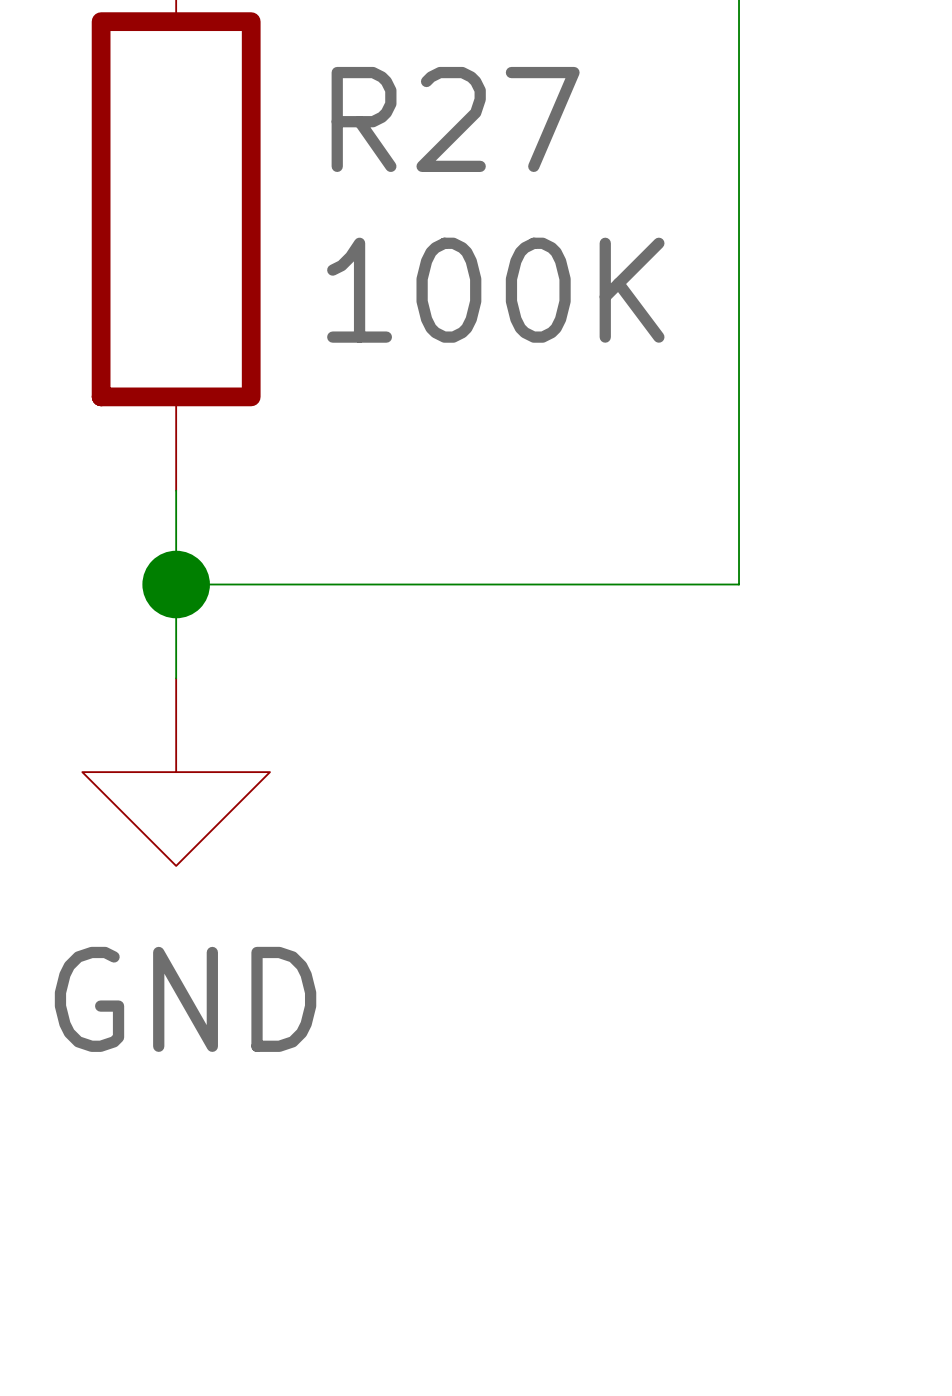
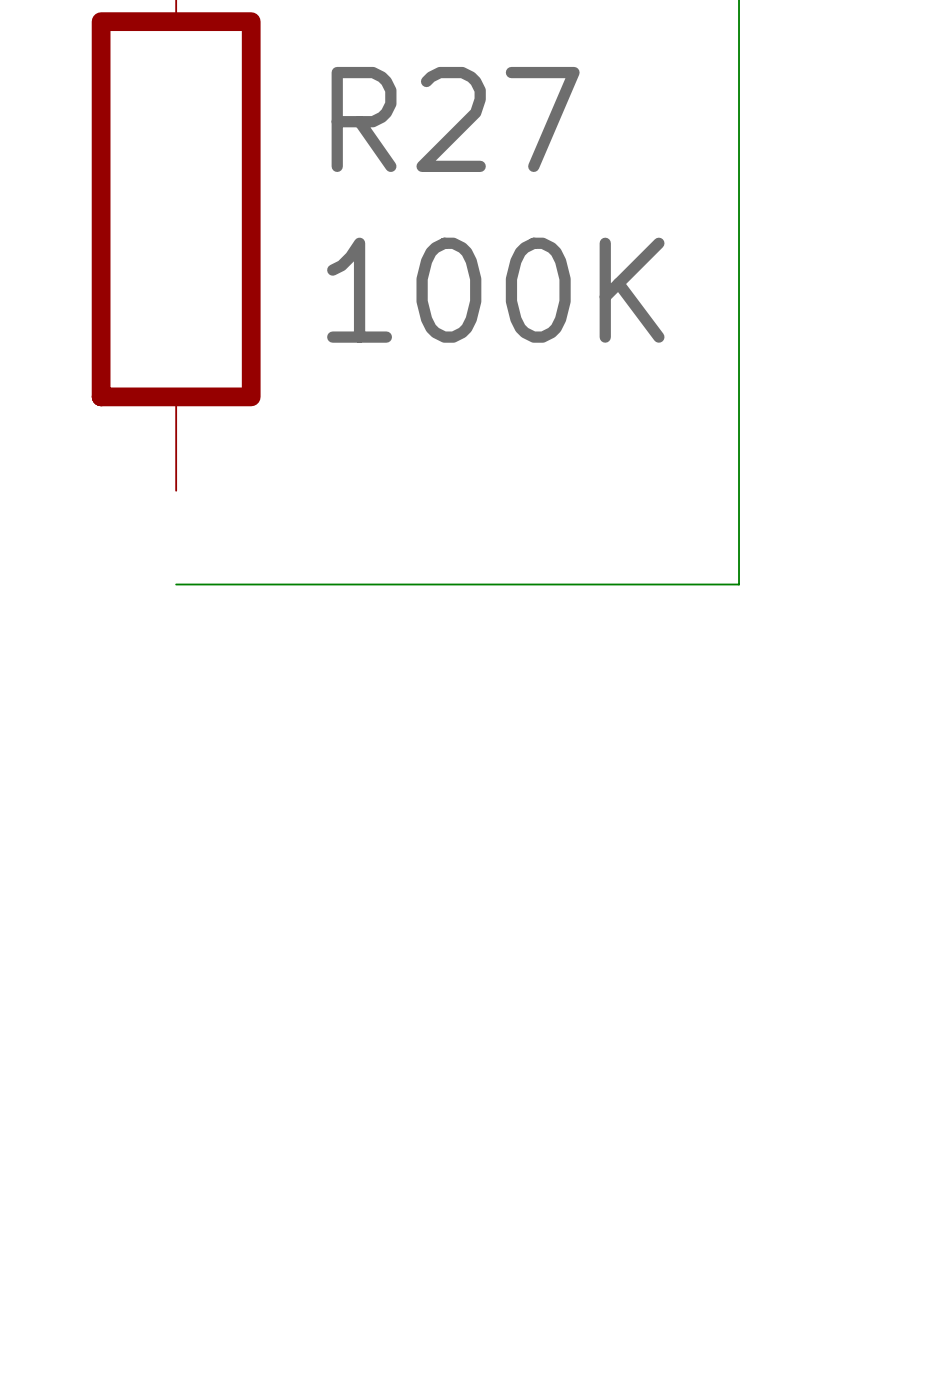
wire: (176, 490) (176, 678) -> none
junction: (176, 584) -> none
power symbol: GND (176, 772) -> none

